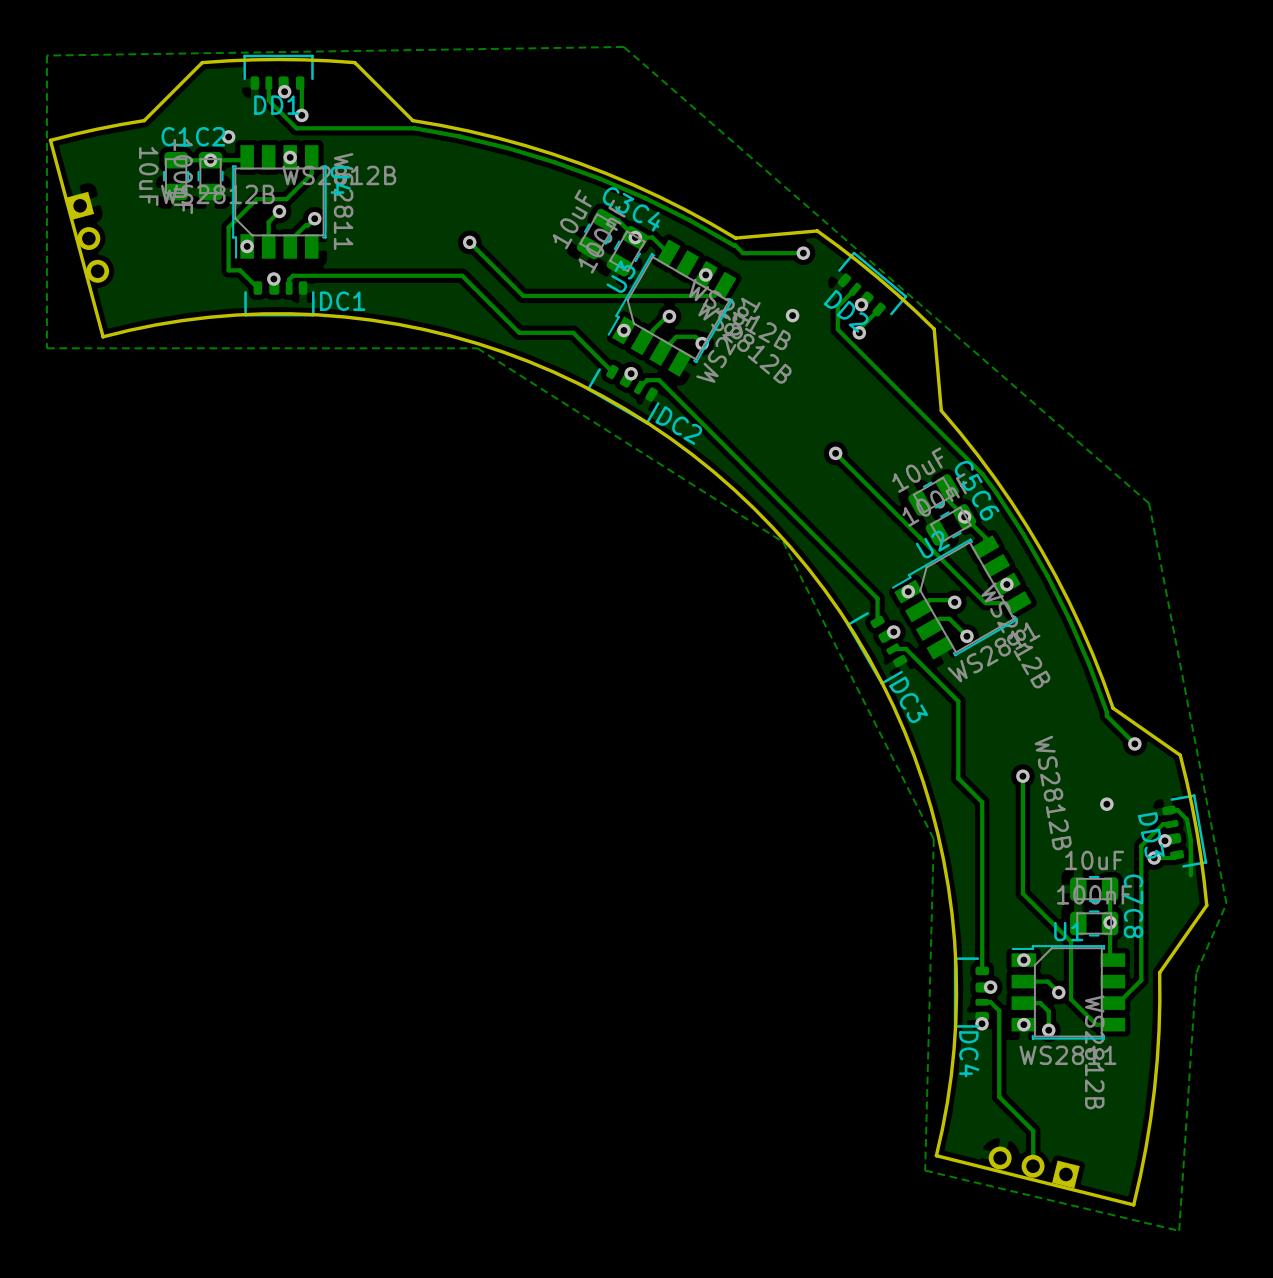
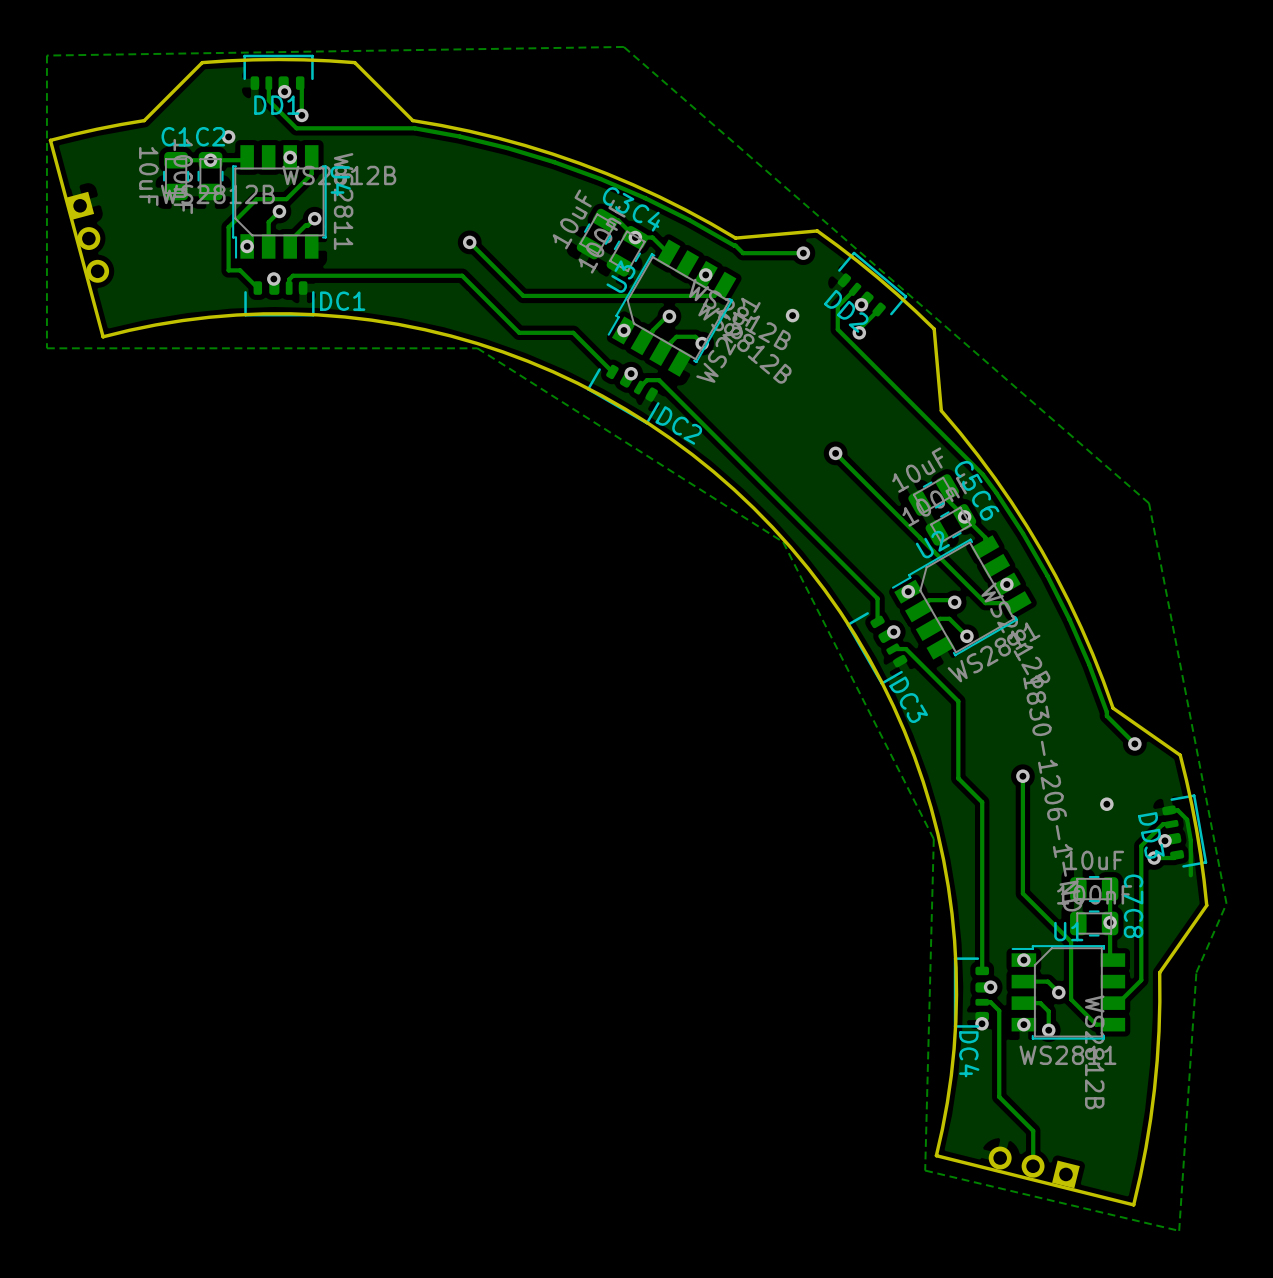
DD3 value: WS2812B (1053, 793) -> 1830-1206-1-ND (1052, 793)

